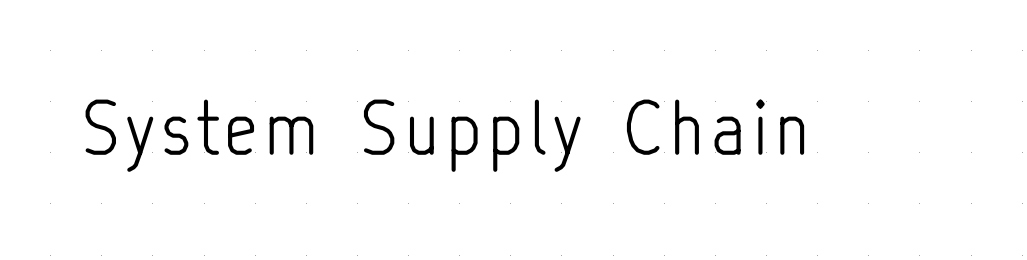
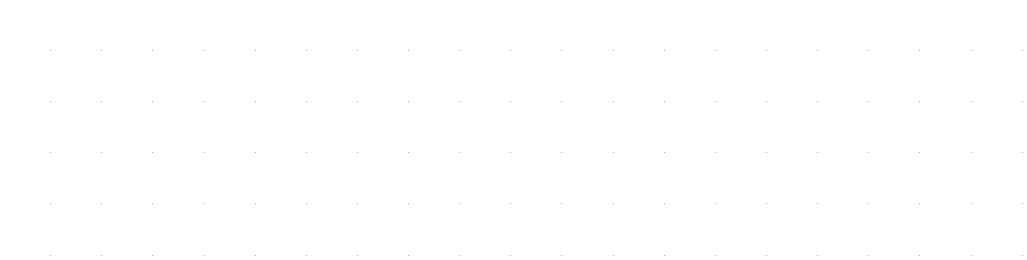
text: System Supply Chain (444, 135) -> none

